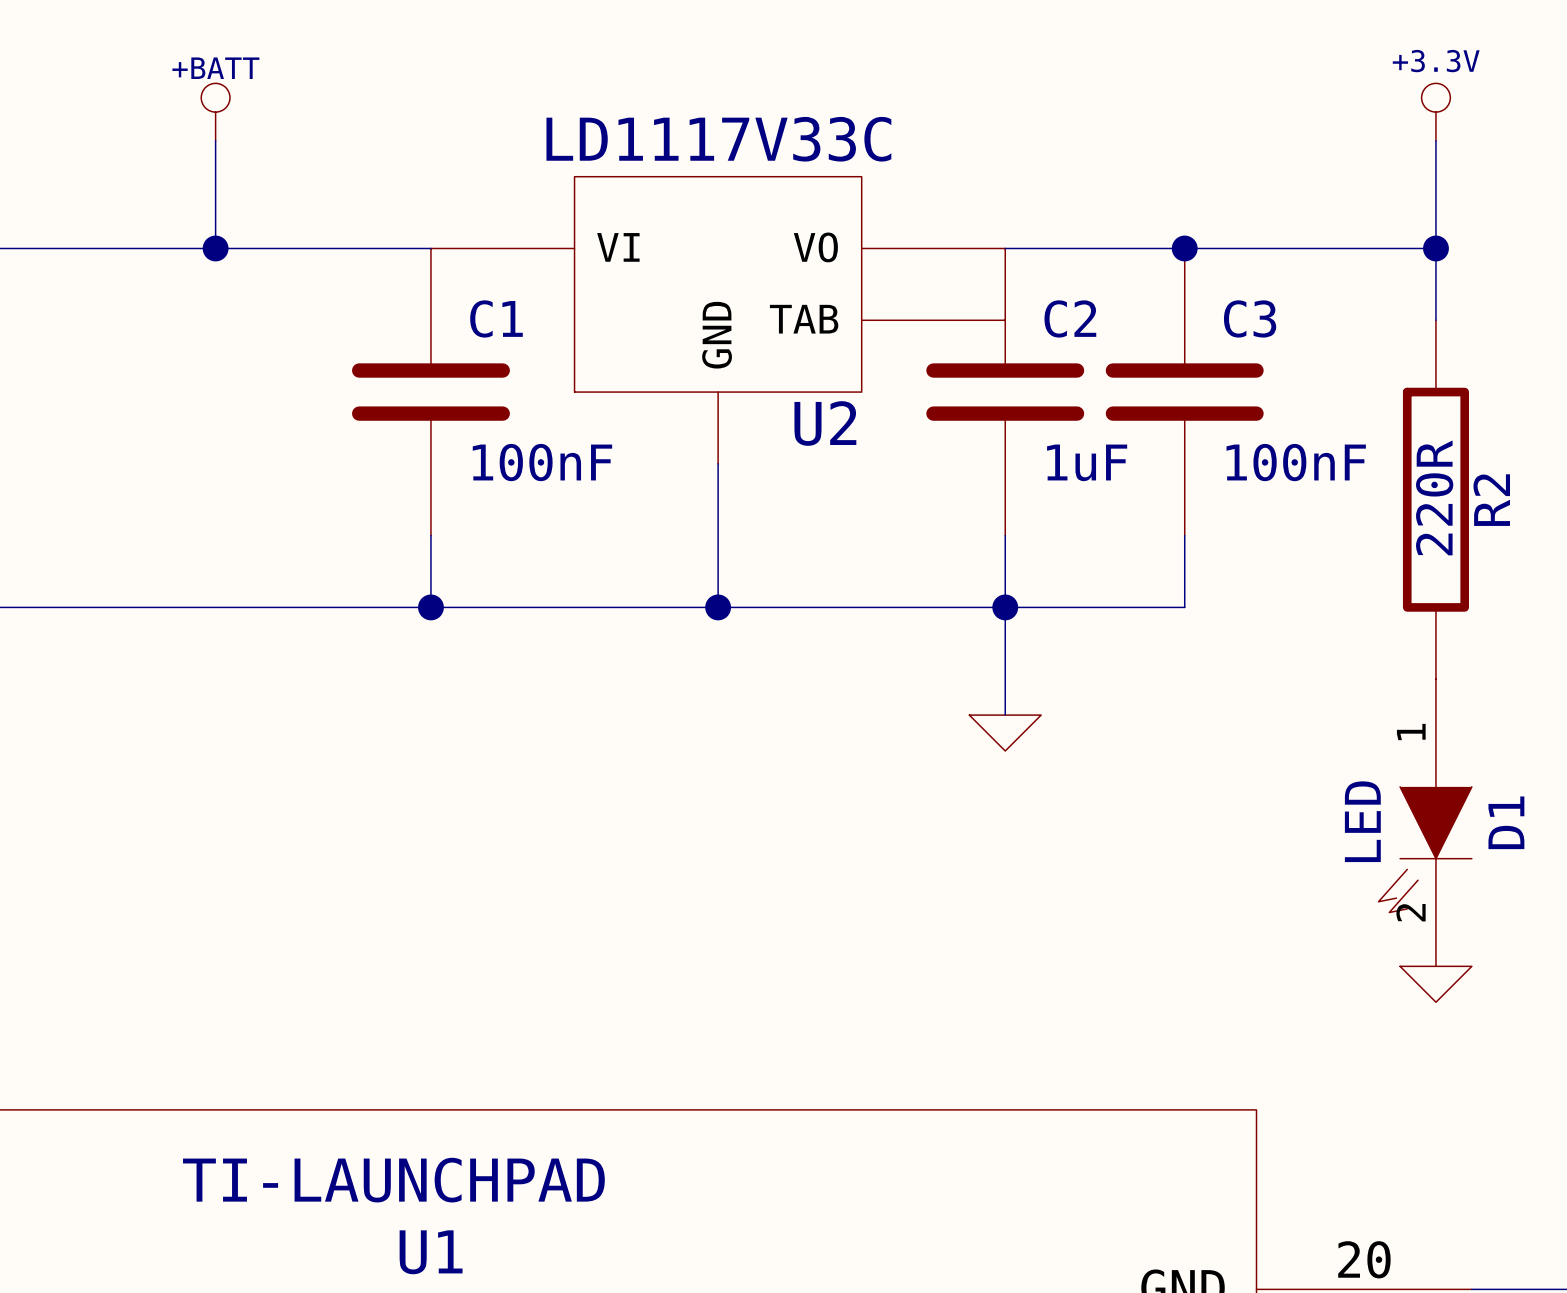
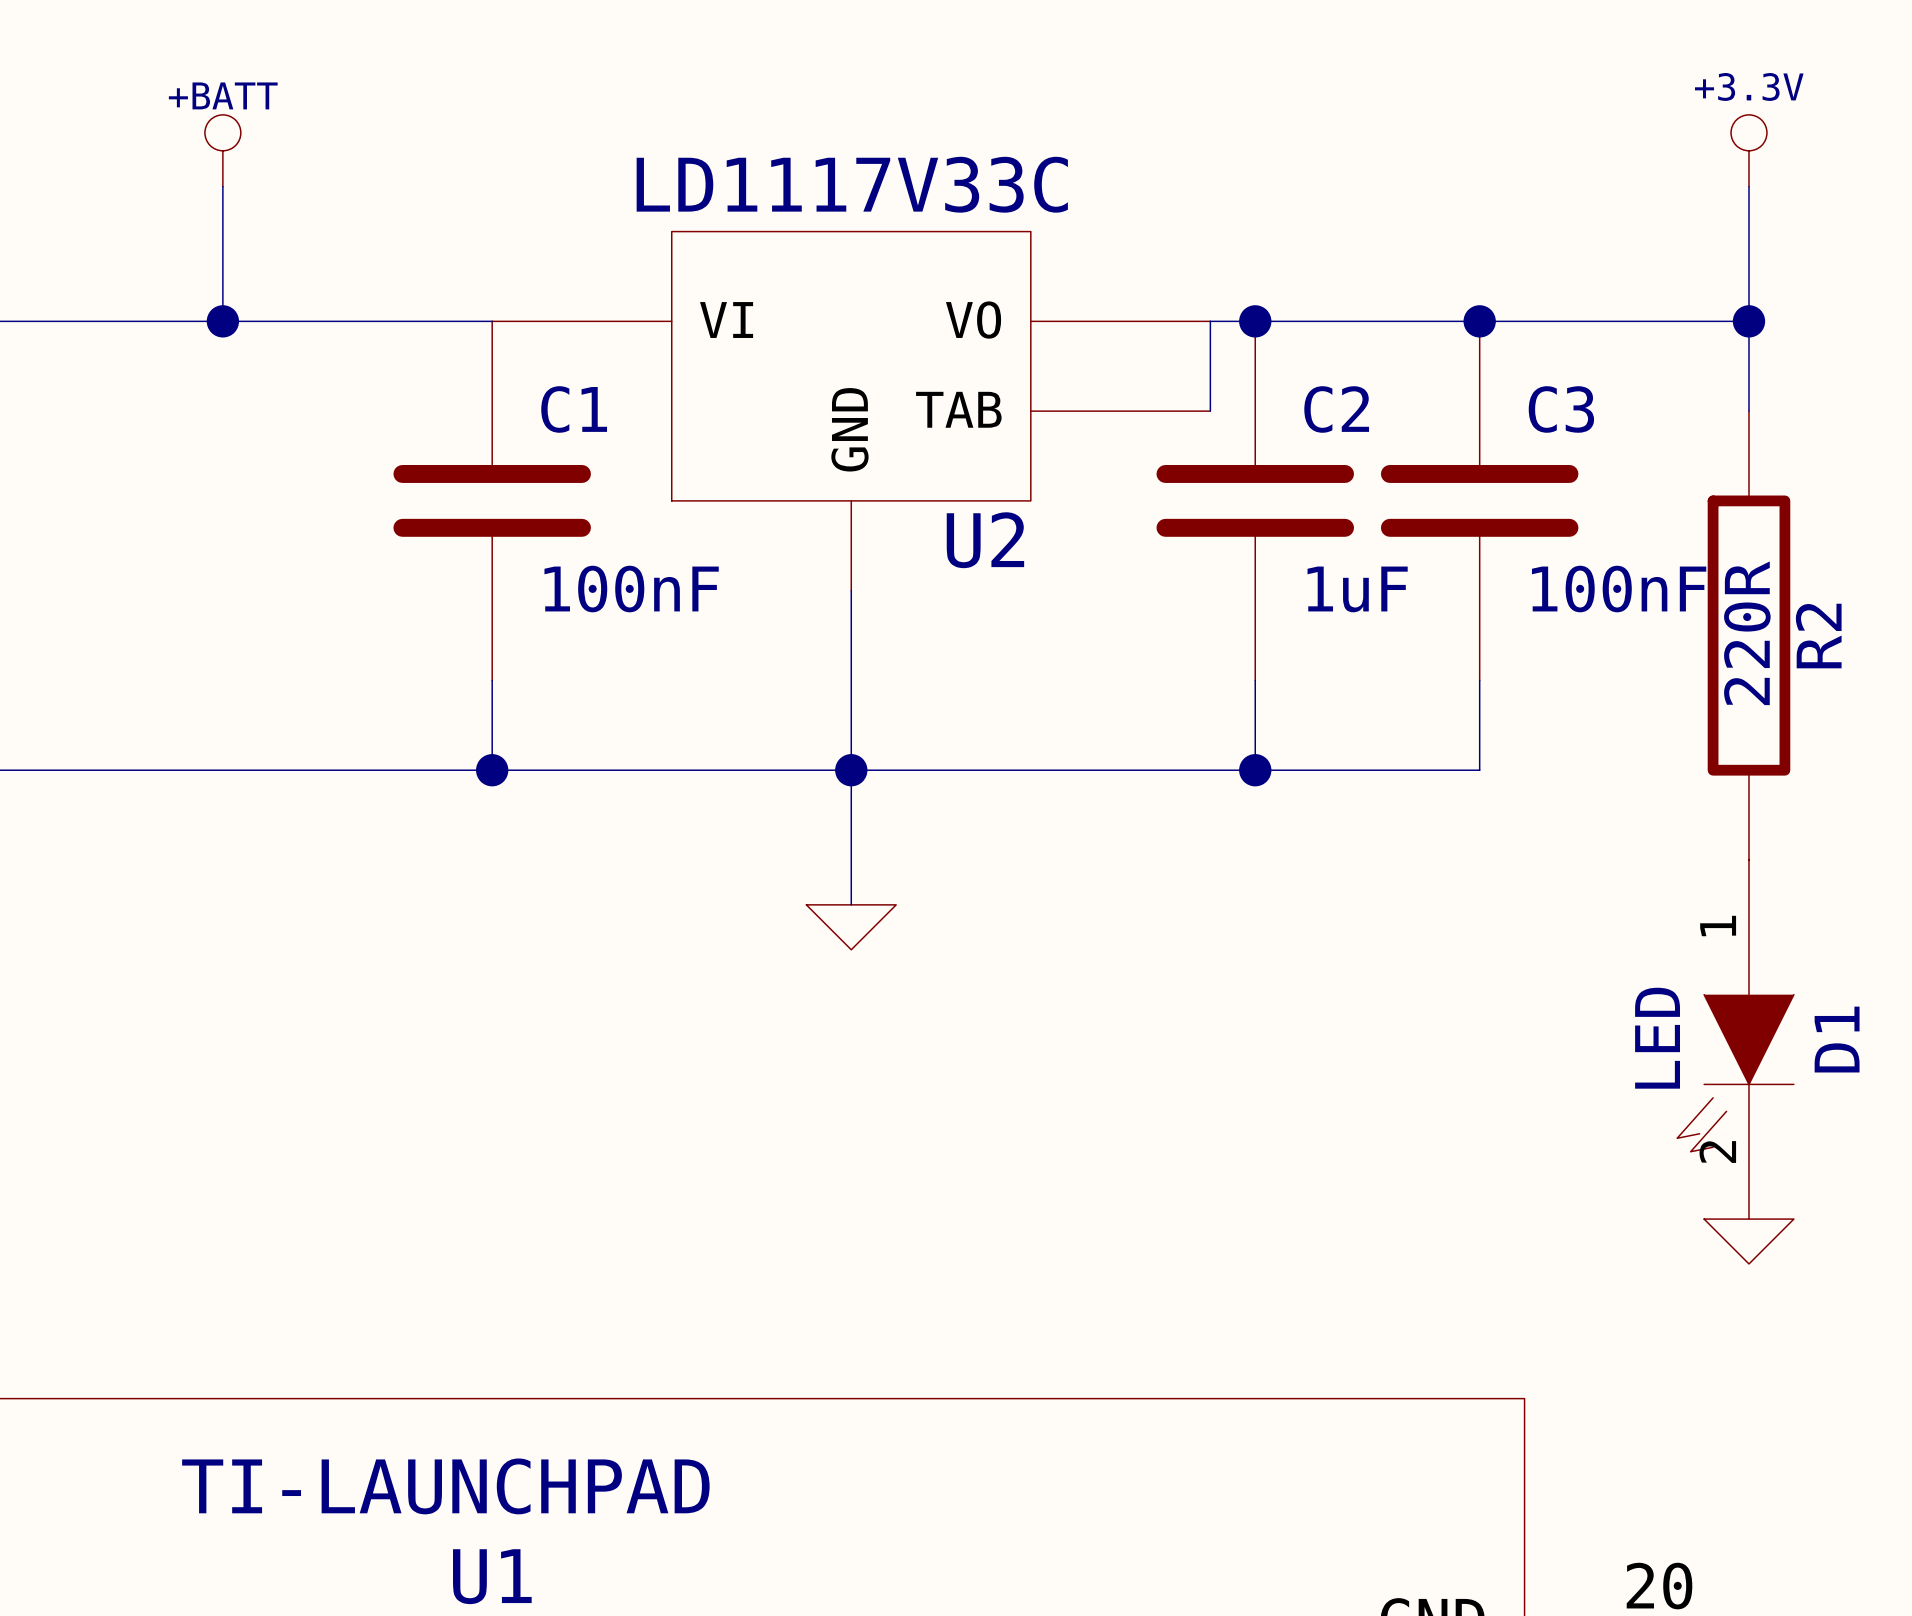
junction: none -> (1255, 321)
junction position: (1184, 248) -> (1479, 321)
C2 position: (1005, 392) -> (1255, 500)
C3 position: (1184, 392) -> (1479, 500)
wire: (1005, 535) (1005, 715) -> none
wire: none -> (1255, 680) (1255, 770)
wire: (1184, 535) (1184, 607) -> (1479, 680) (1479, 770) (1434, 770)
wire: none -> (851, 770) (851, 904)
junction position: (1005, 607) -> (1255, 770)
power symbol position: (1005, 733) -> (851, 927)

